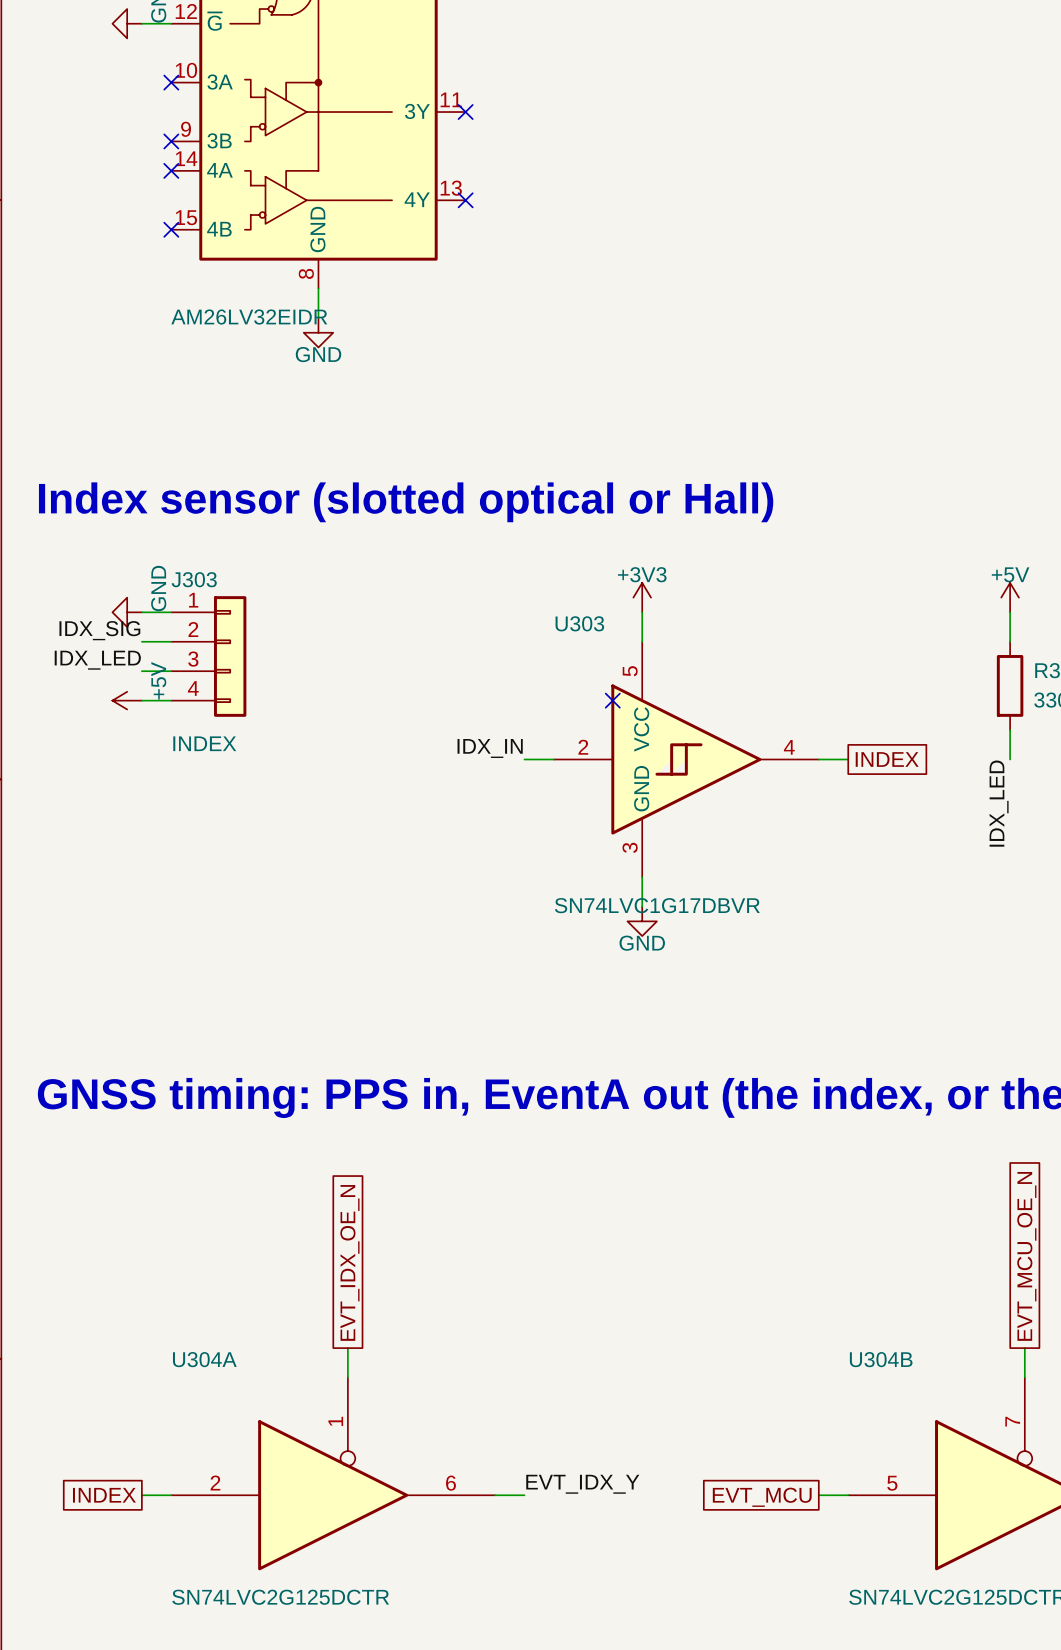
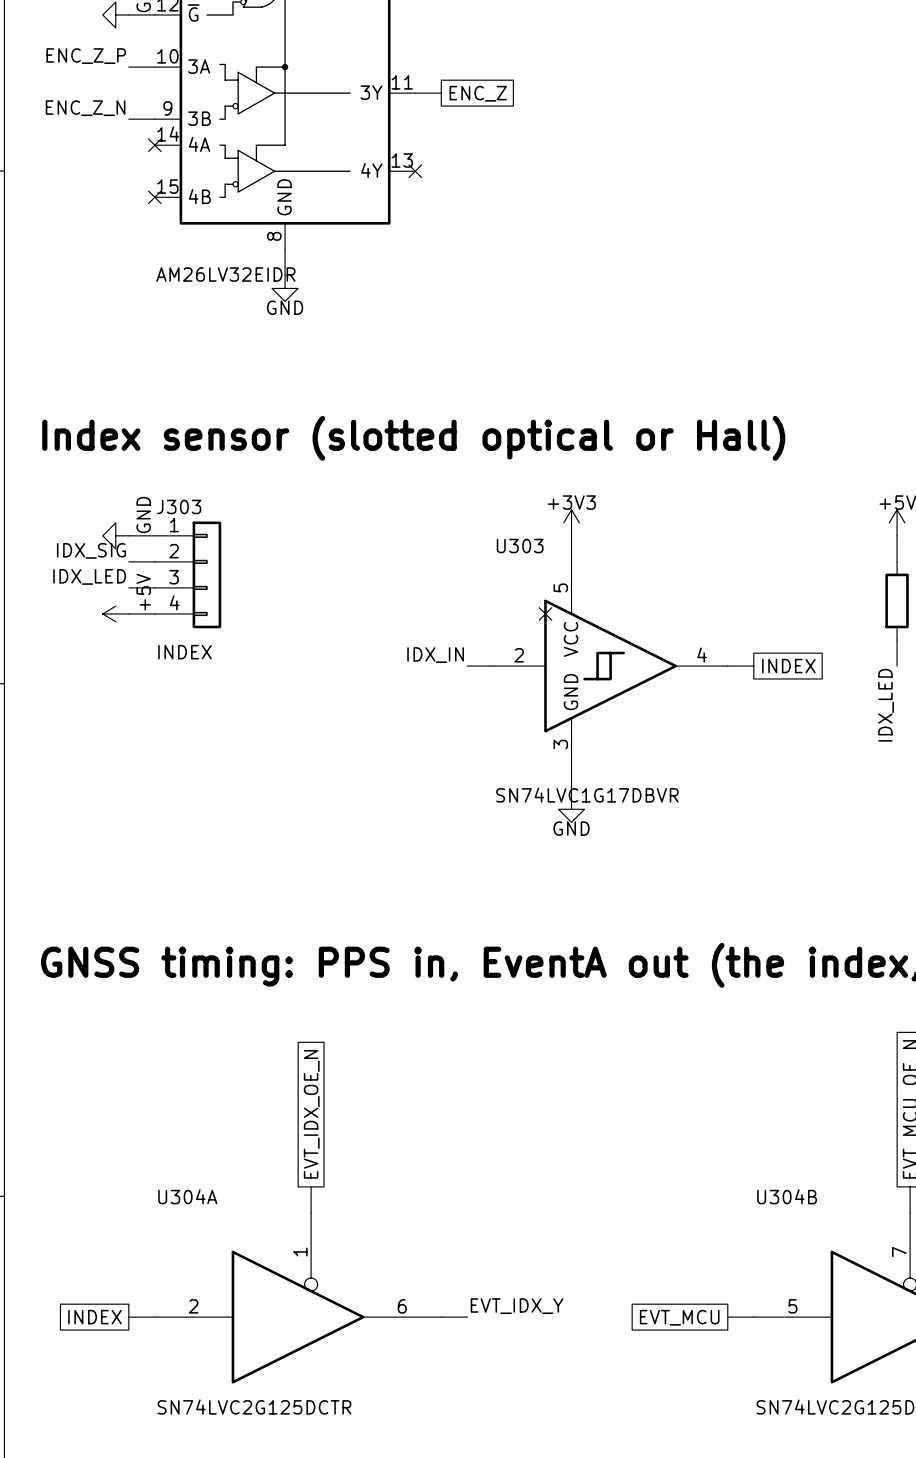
label: none -> ENC_Z_P (86, 56)
wire: none -> (128, 67) (154, 67)
no-connect mark: (171, 82) -> none
wire: none -> (415, 93) (441, 93)
no-connect mark: (465, 112) -> none
global label: none -> ENC_Z (478, 93)
label: none -> ENC_Z_N (85, 108)
wire: none -> (128, 119) (154, 119)
no-connect mark: (171, 141) -> none

